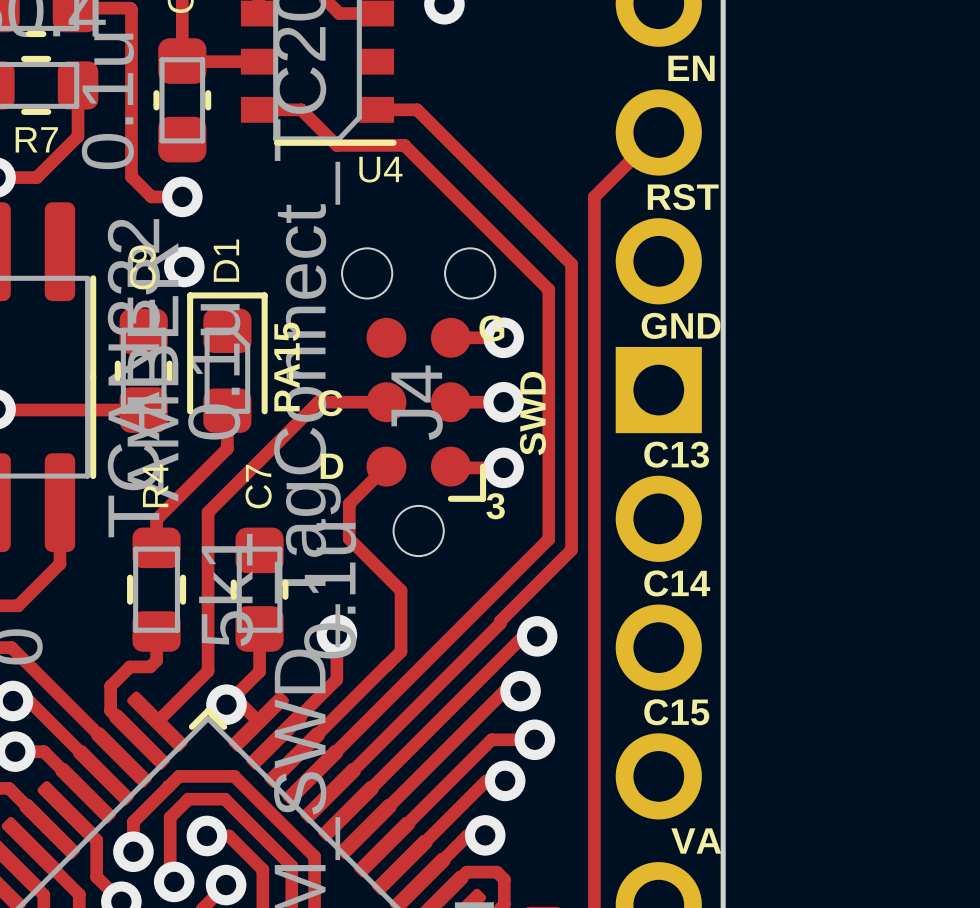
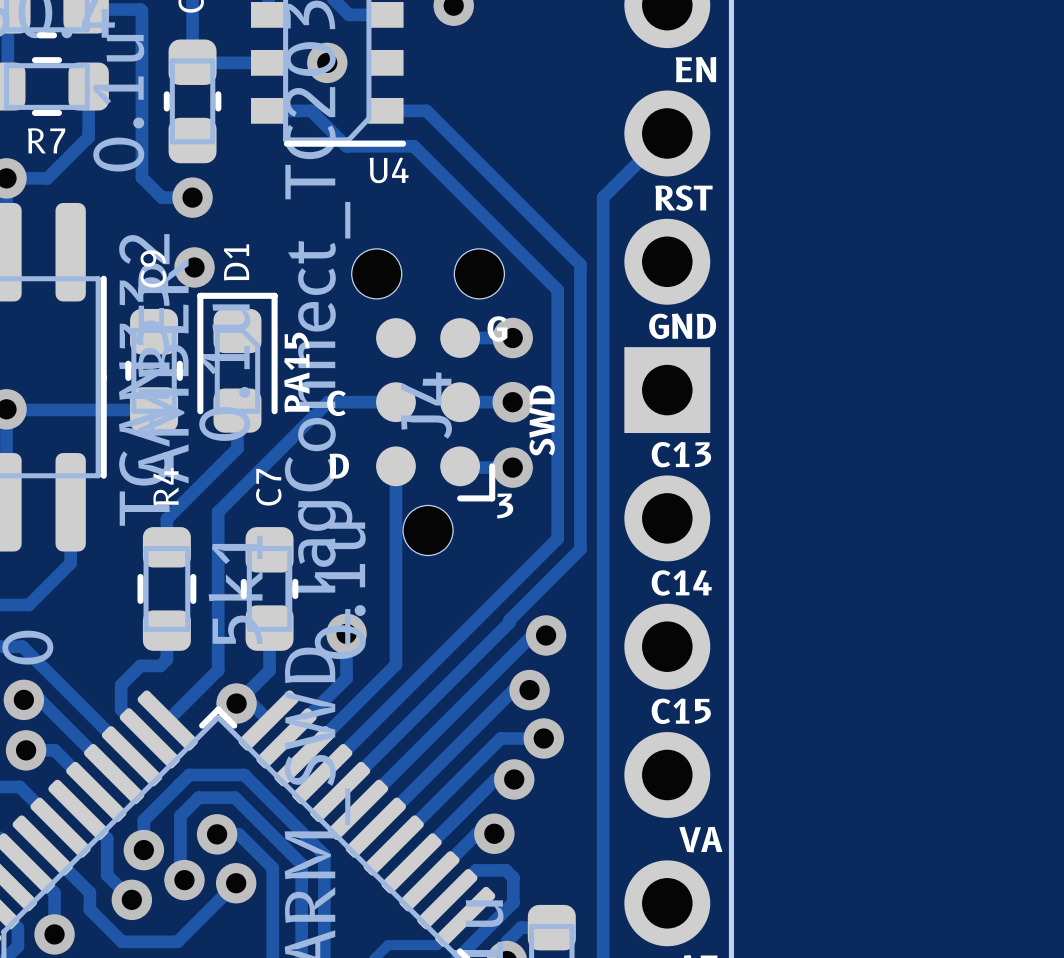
via: none -> (327, 62)
track: (386, 466) (349, 503) (349, 538) (401, 590) (401, 651) (386, 665) -> (395, 467) (395, 664)

